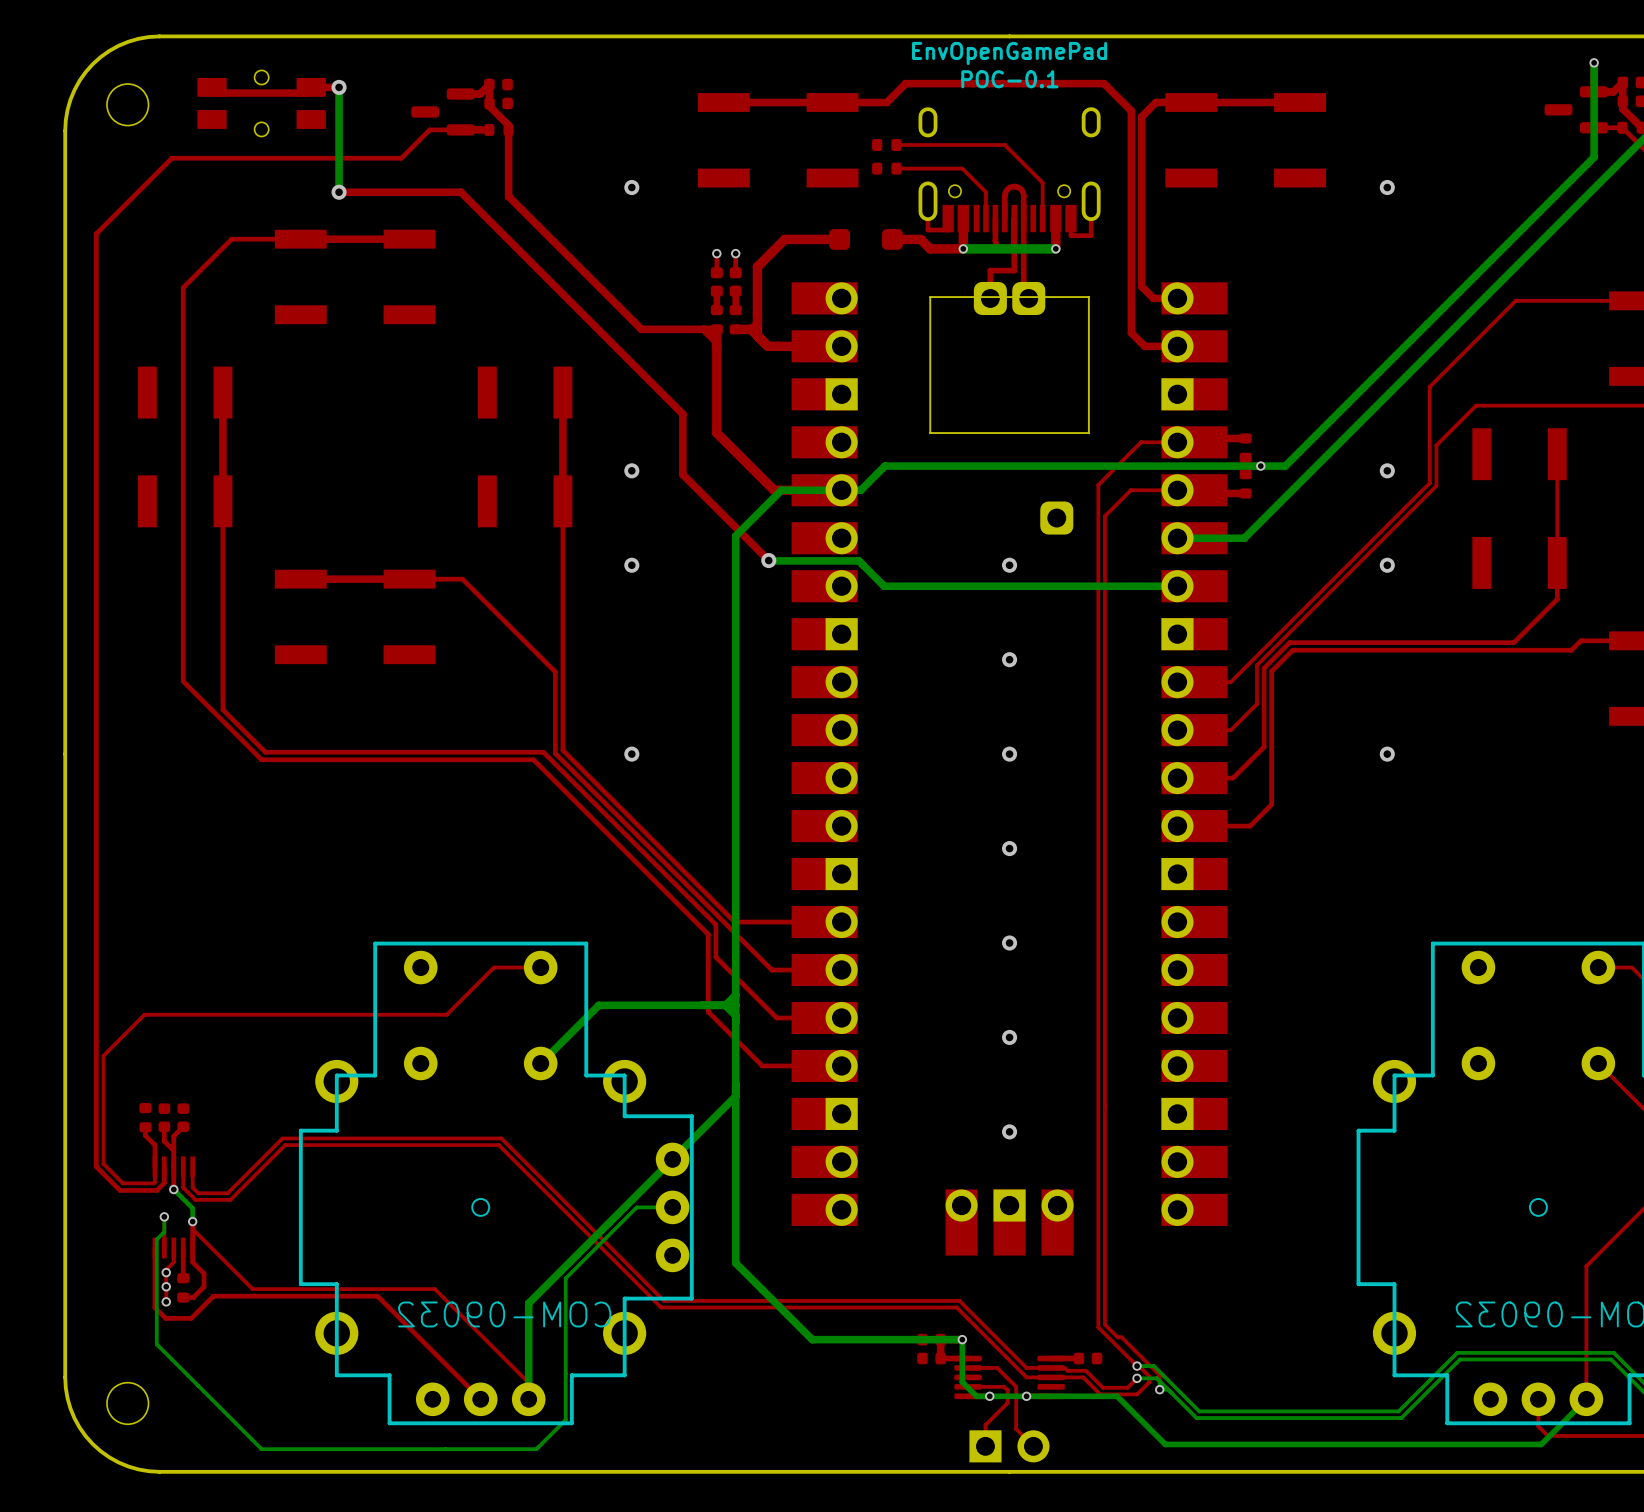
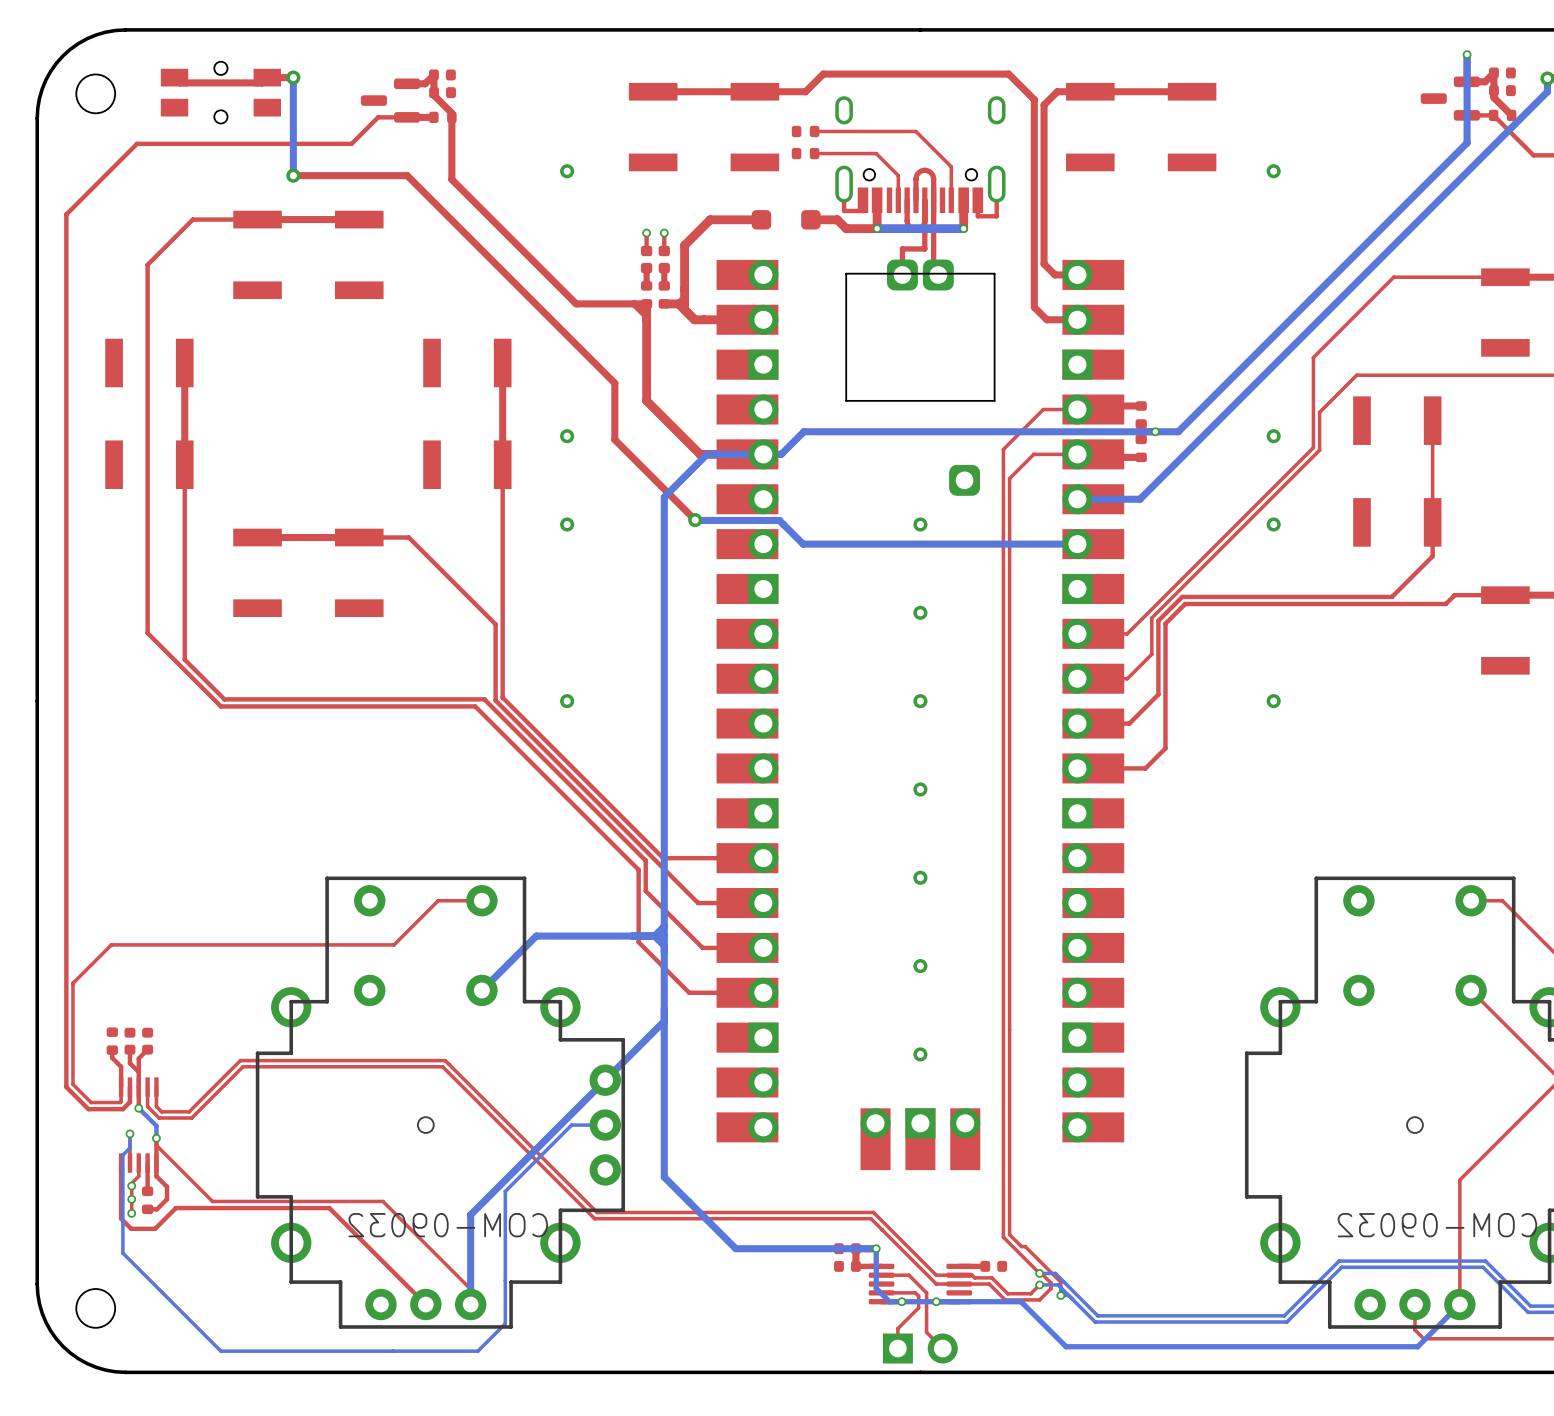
text: EnvOpenGamePad (1009, 53) -> none
text: POC-0.1 (1009, 79) -> none

